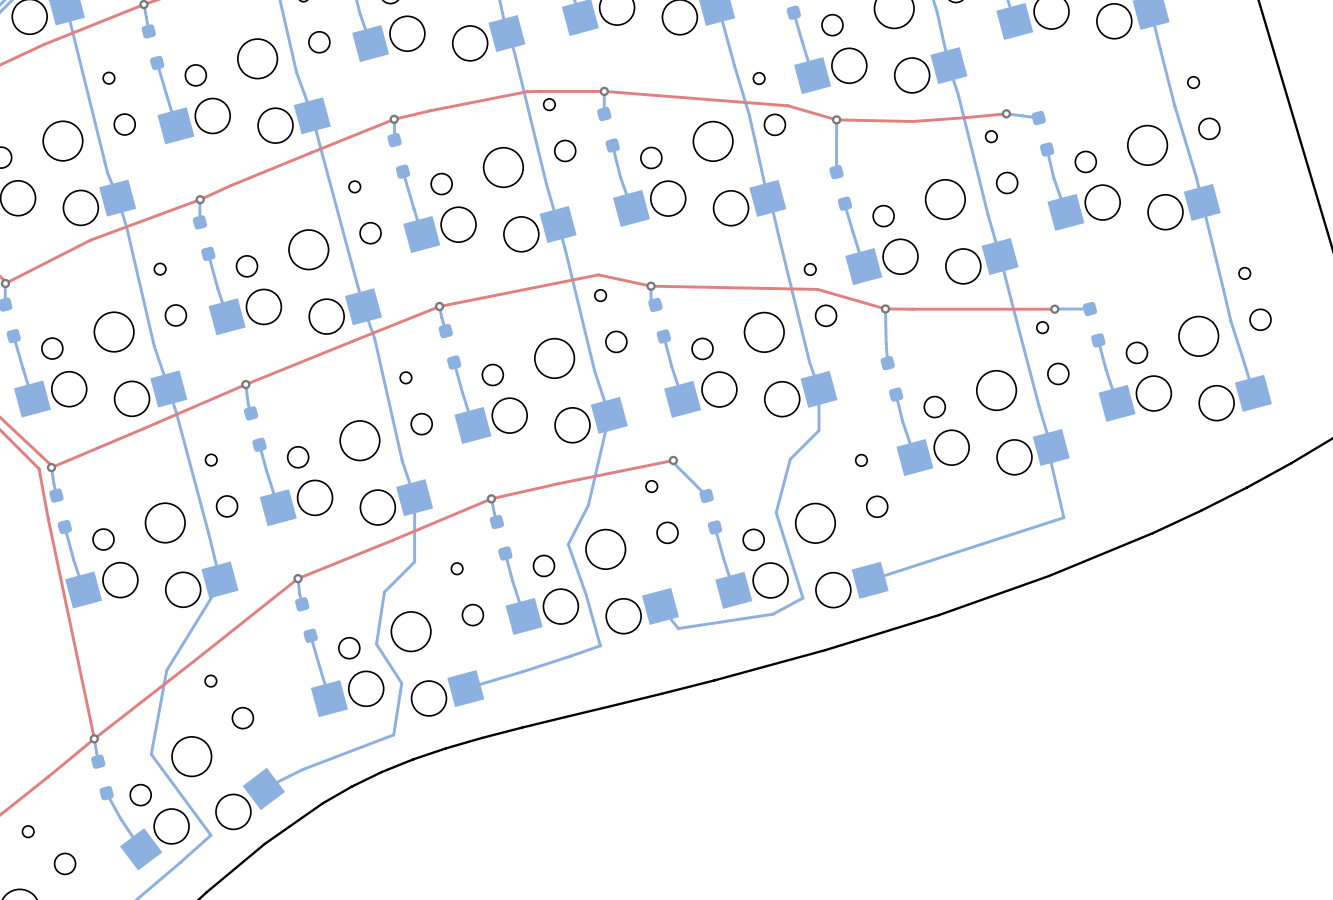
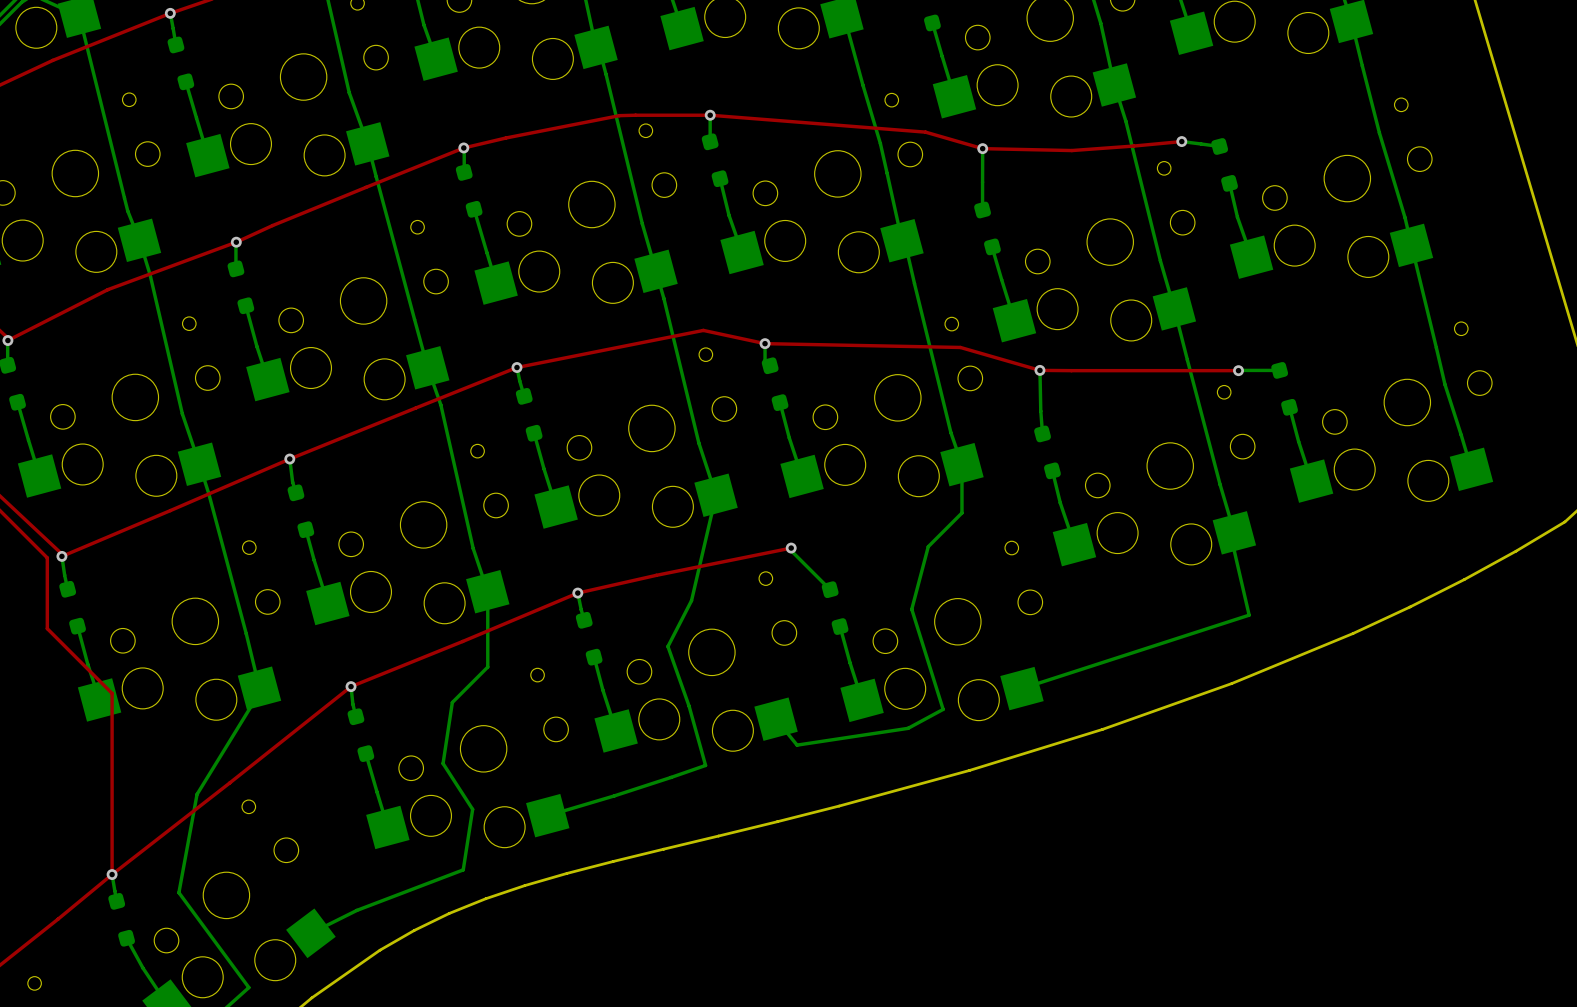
top track: (39, 468) (94, 738) -> (47, 557) (47, 628) (112, 693) (112, 874)

